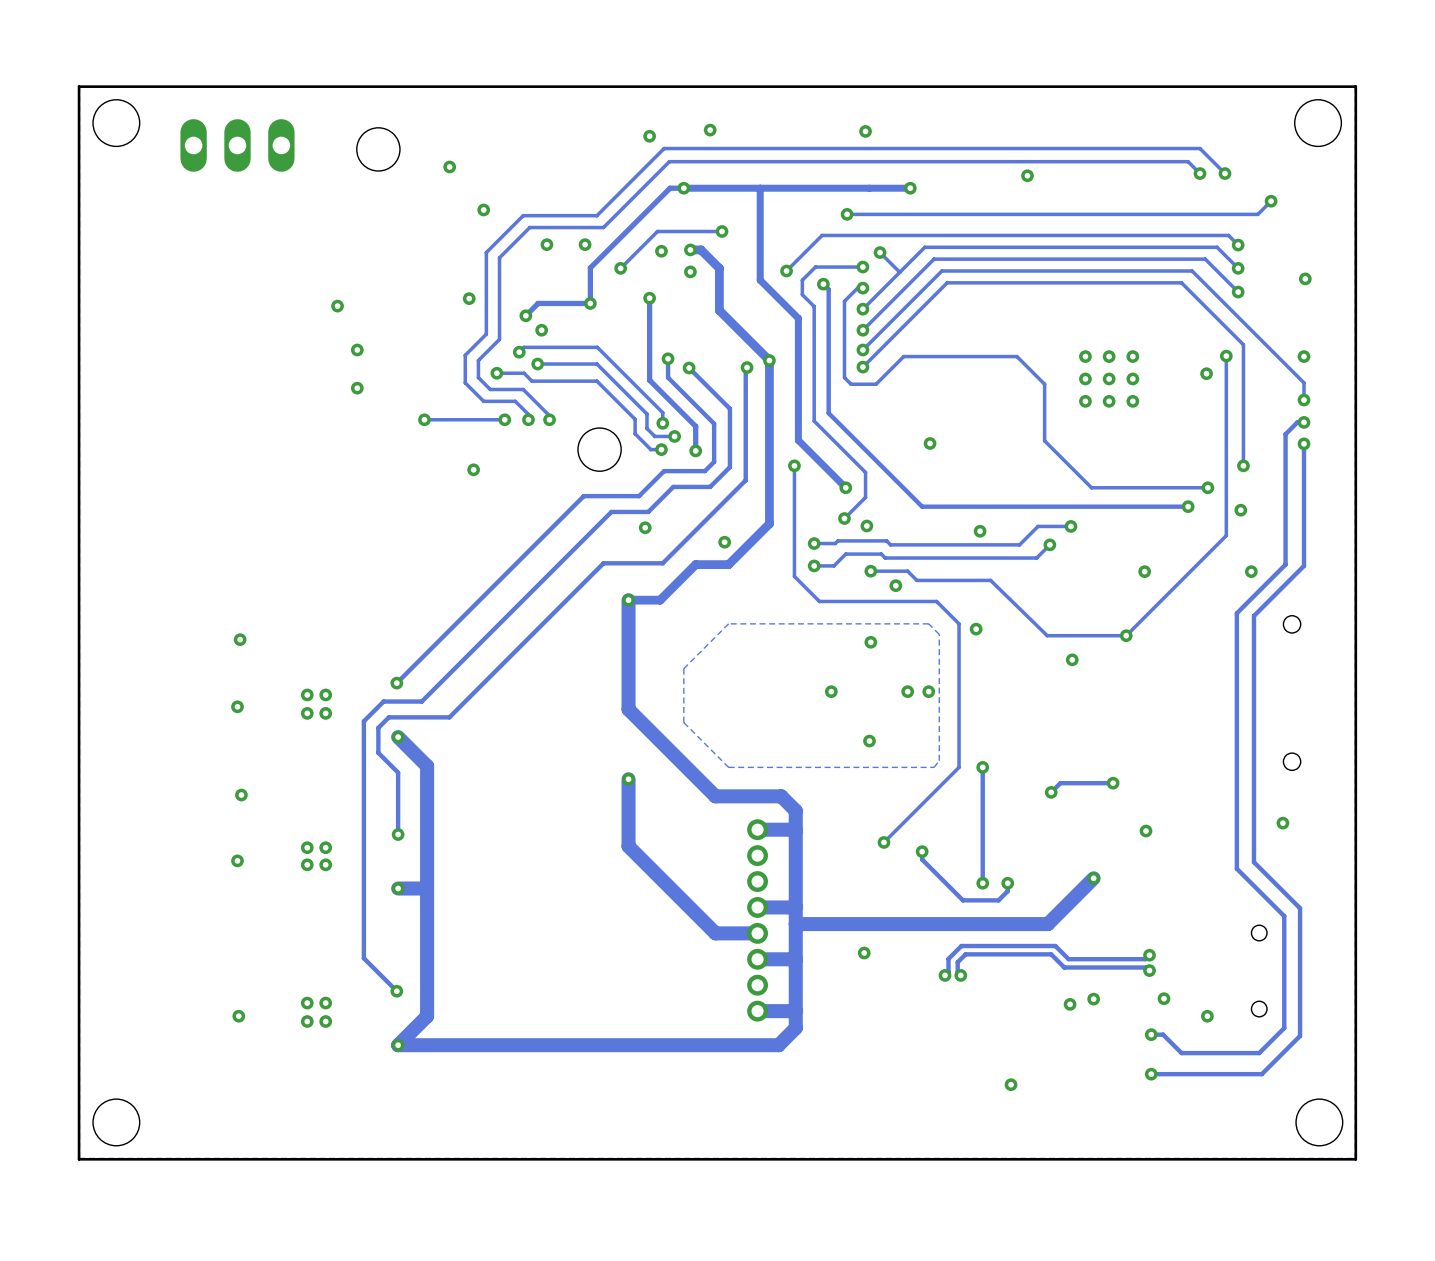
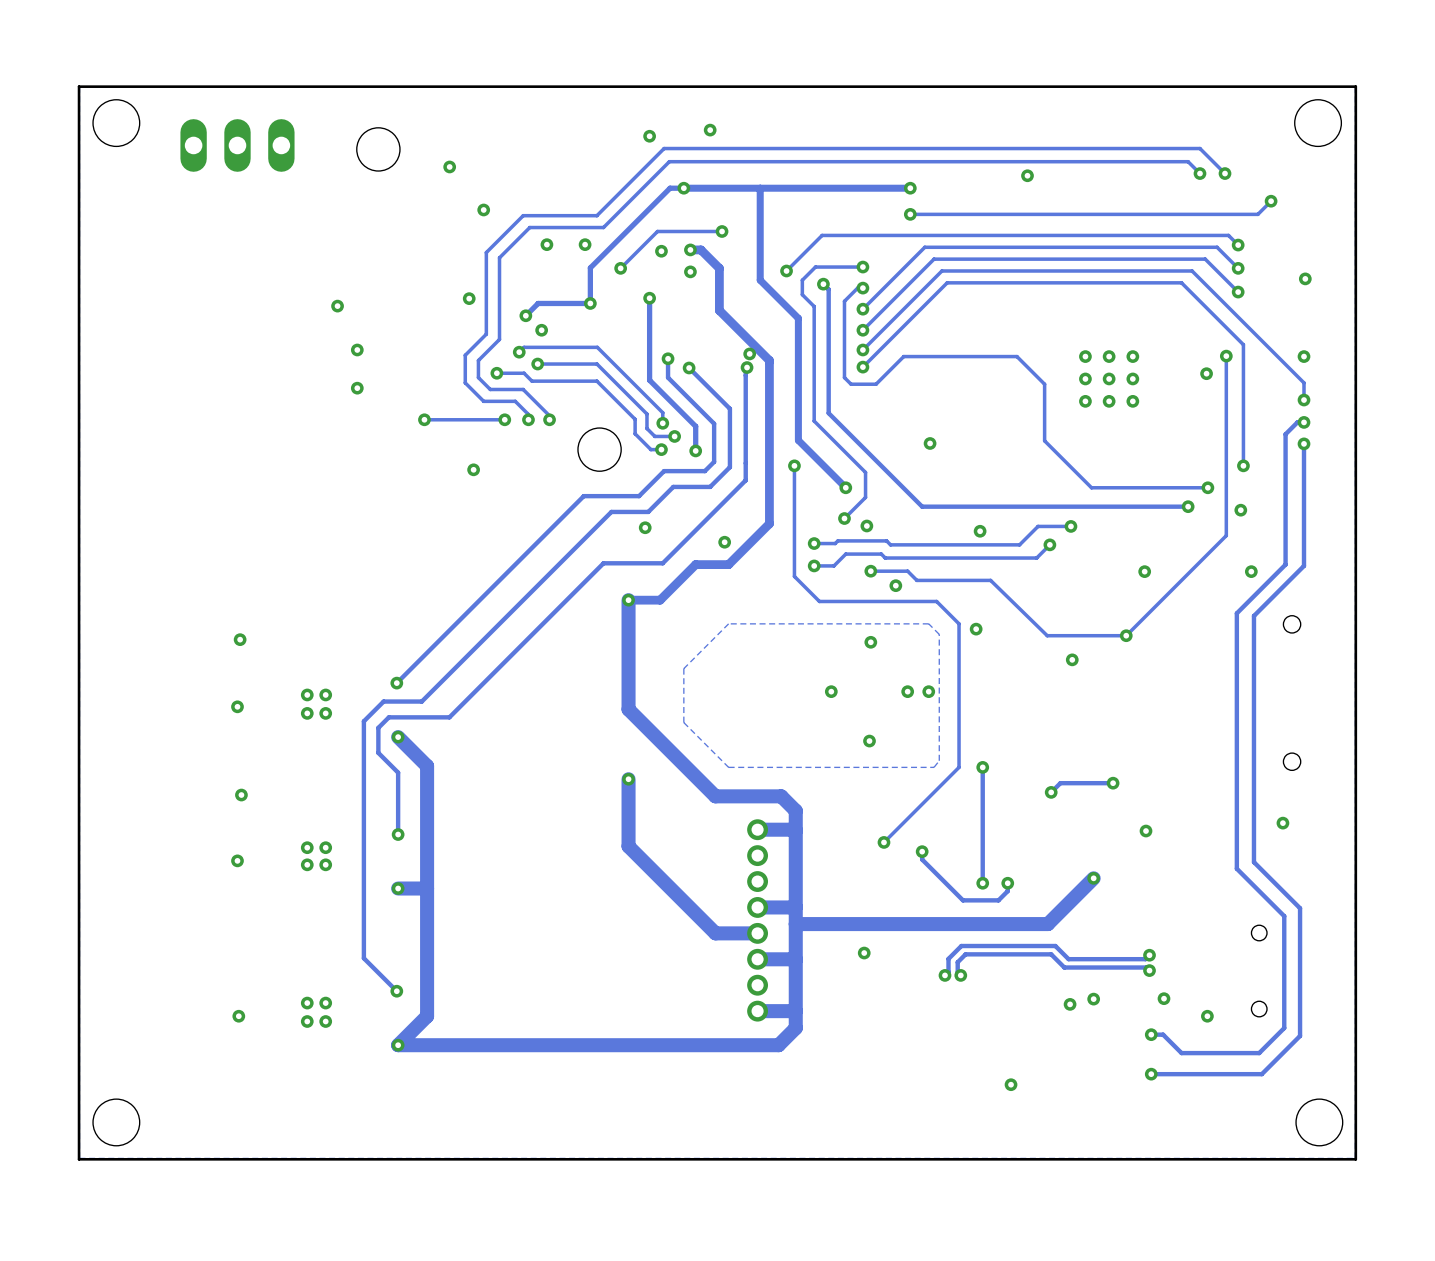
via: (865, 131) -> none
via: (847, 214) -> none
track: (910, 214) (847, 214) -> none
via: none -> (910, 214)
track: (880, 252) (899, 272) -> none
via: (880, 252) -> none
via position: (769, 360) -> (749, 353)

